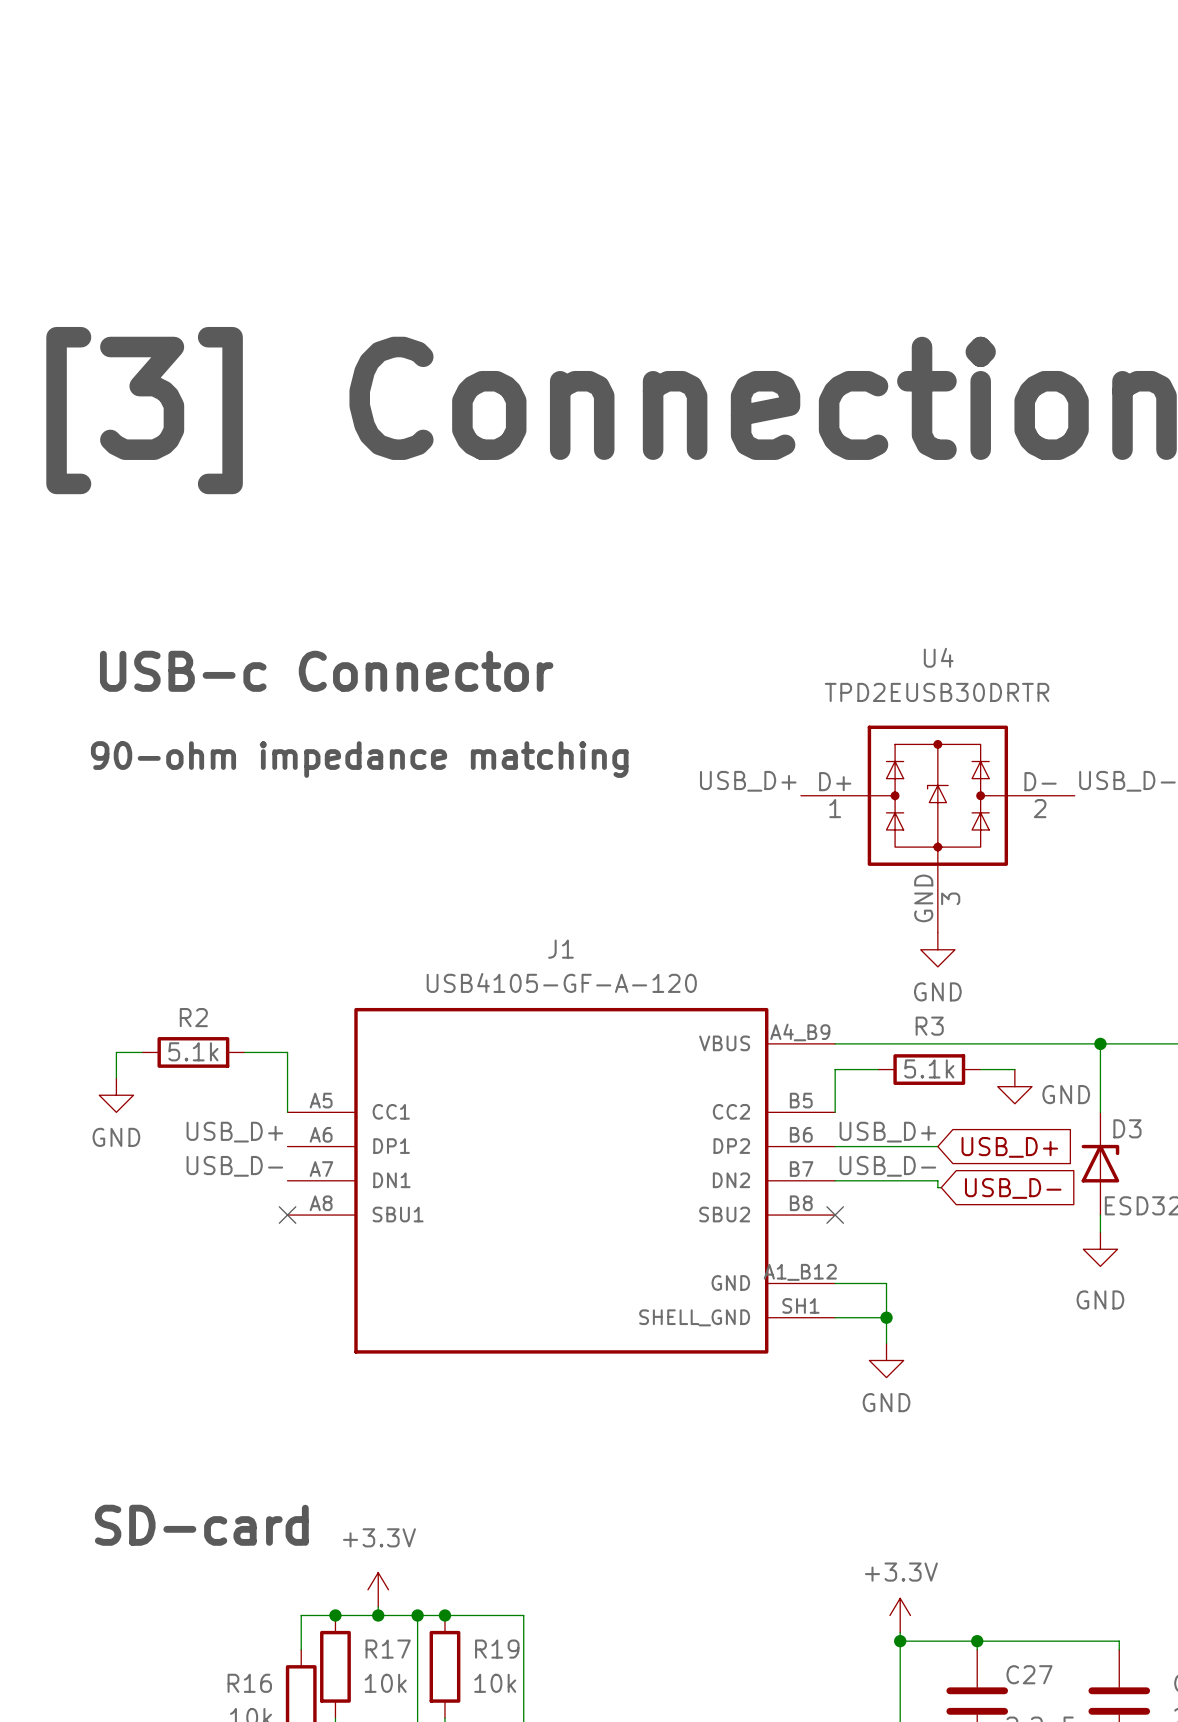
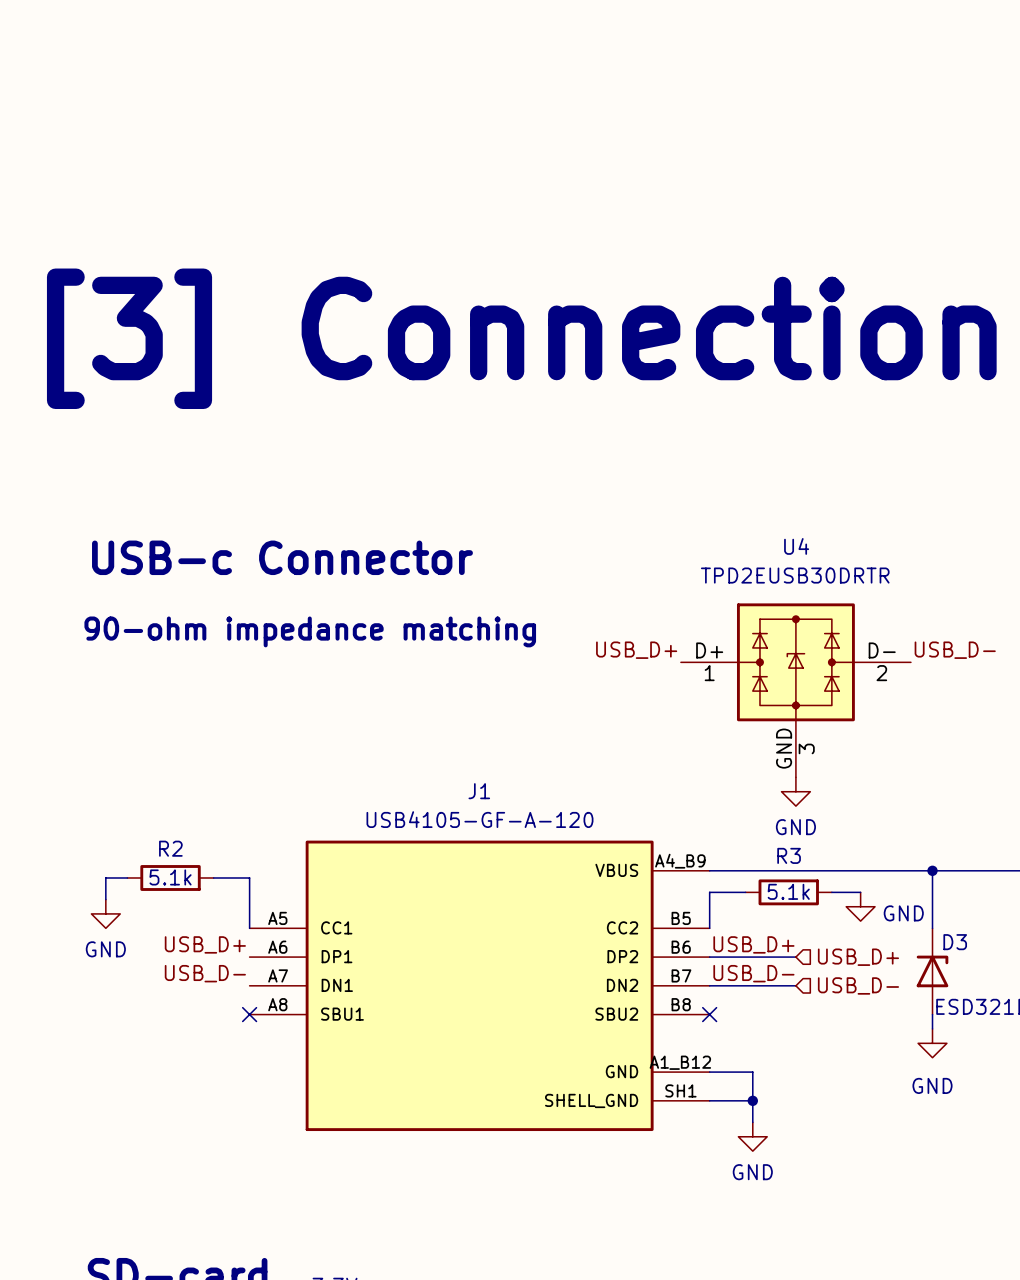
hierarchical label: none -> USB_D+ (858, 957)
global label: USB_D+ (1009, 1147) -> none
wire: (937, 1180) (937, 1187) (941, 1187) -> none
hierarchical label: none -> USB_D- (858, 985)
global label: USB_D- (1013, 1188) -> none

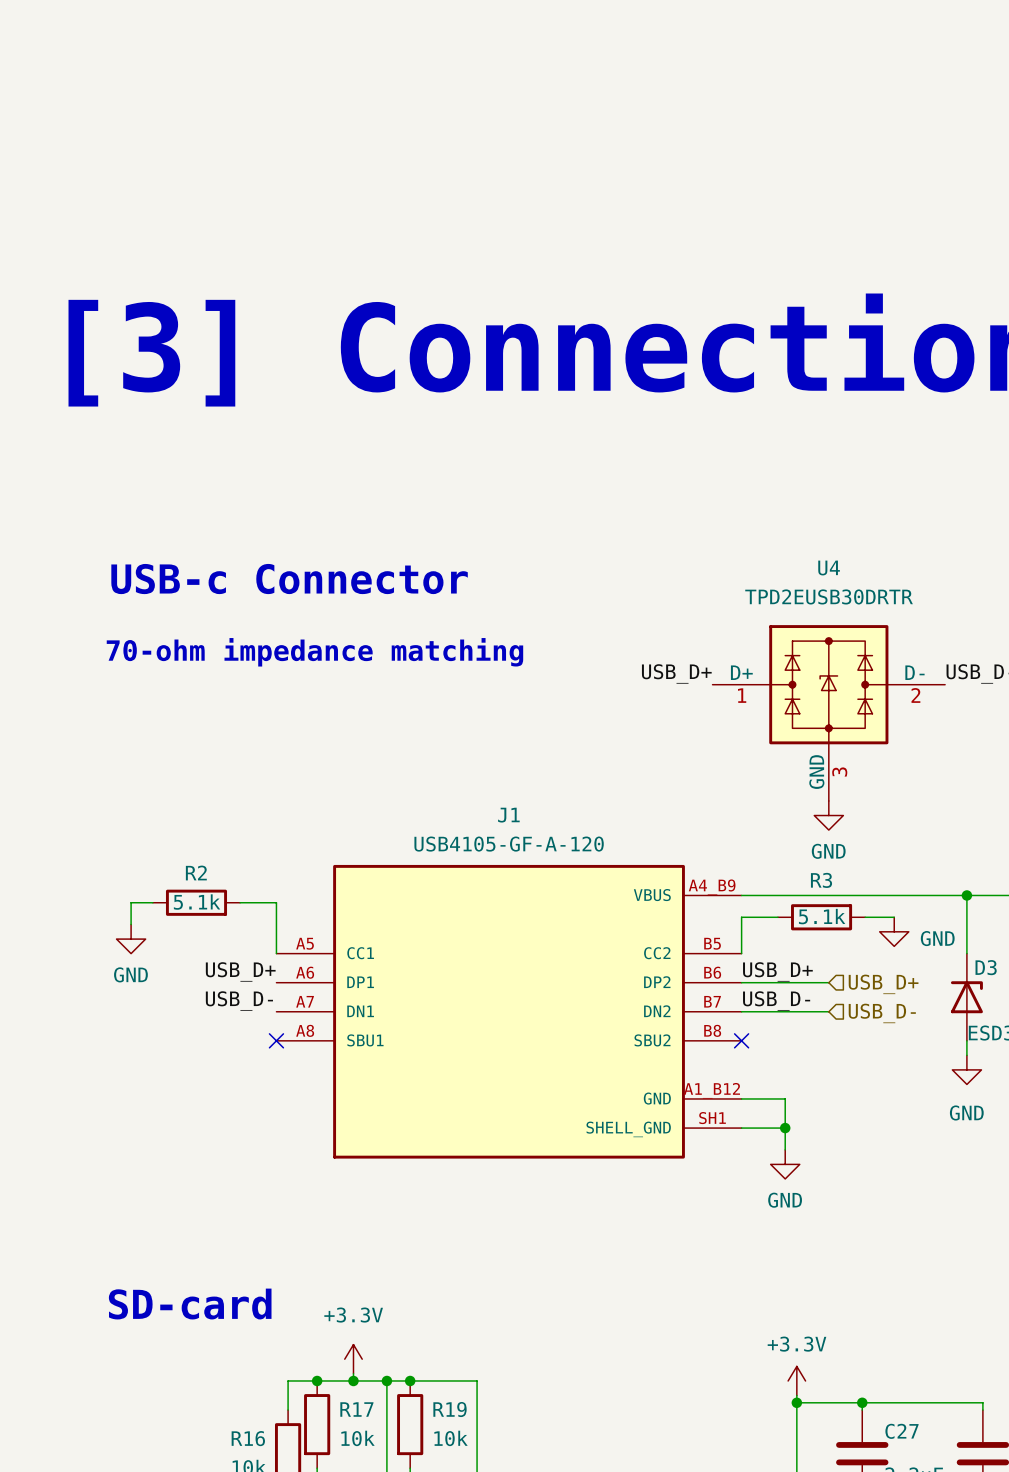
text: 90-ohm impedance matching (310, 631) -> 70-ohm impedance matching (314, 652)

